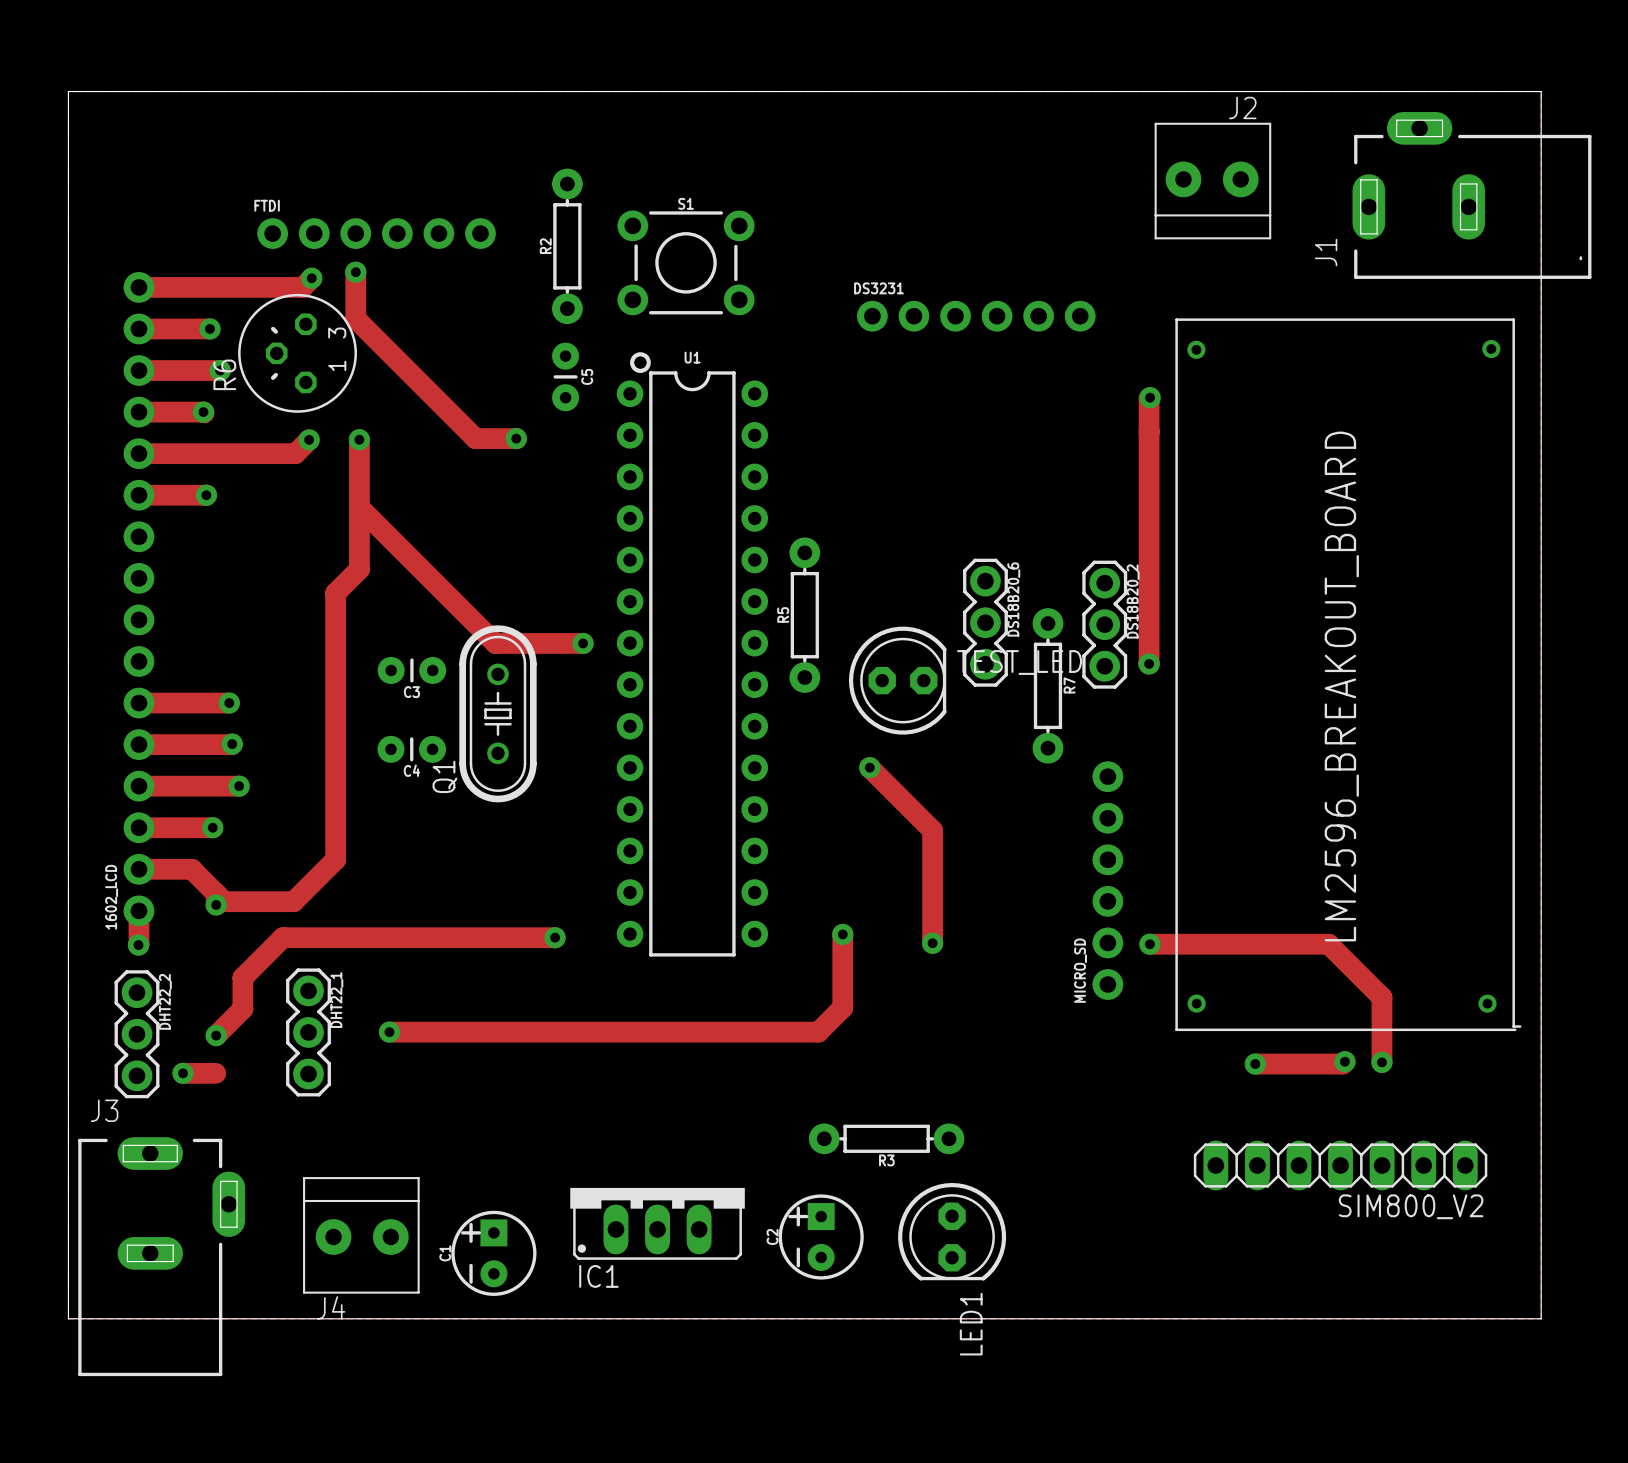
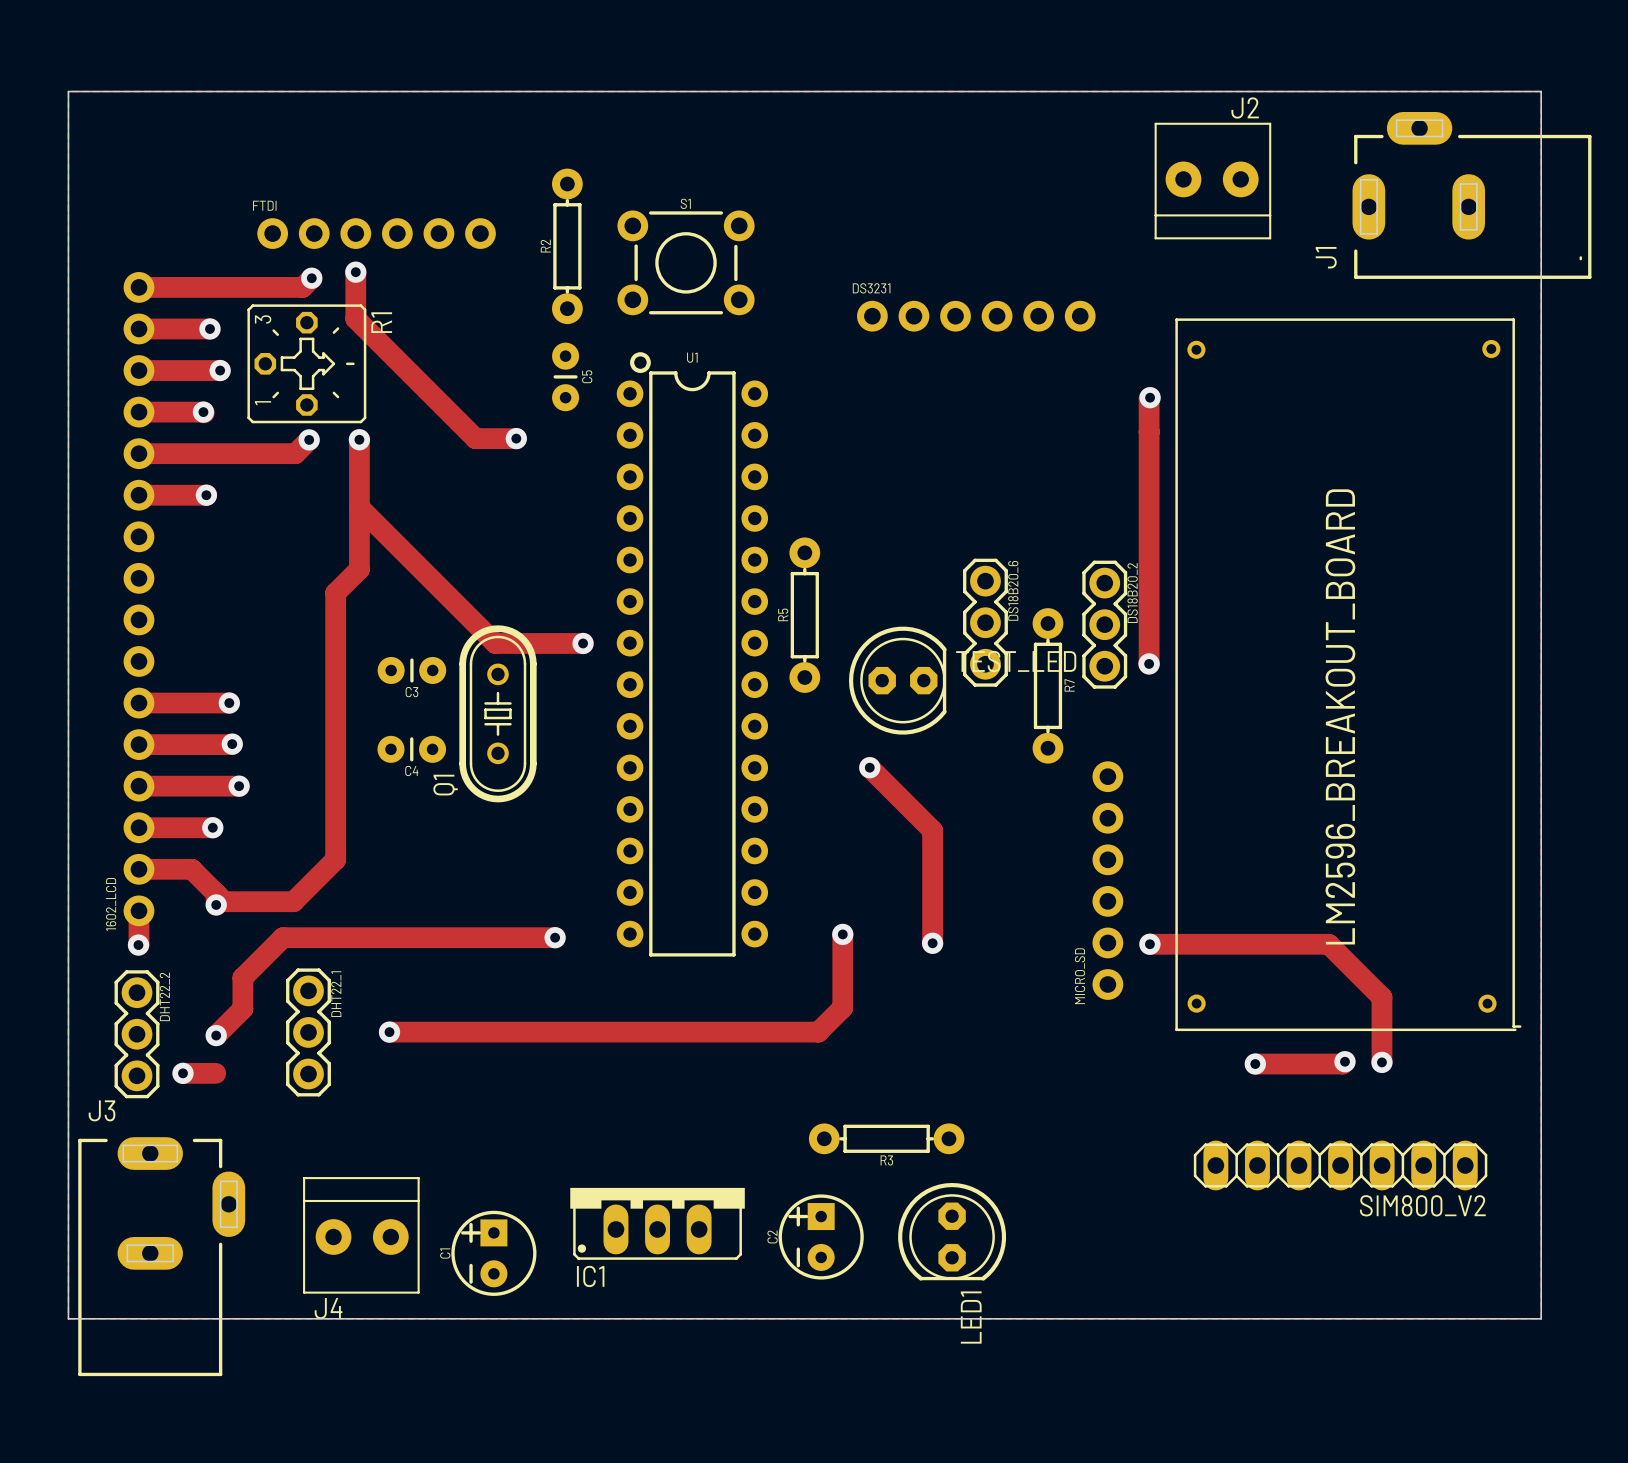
R6: (297, 353) -> none
R1: none -> (306, 363)

